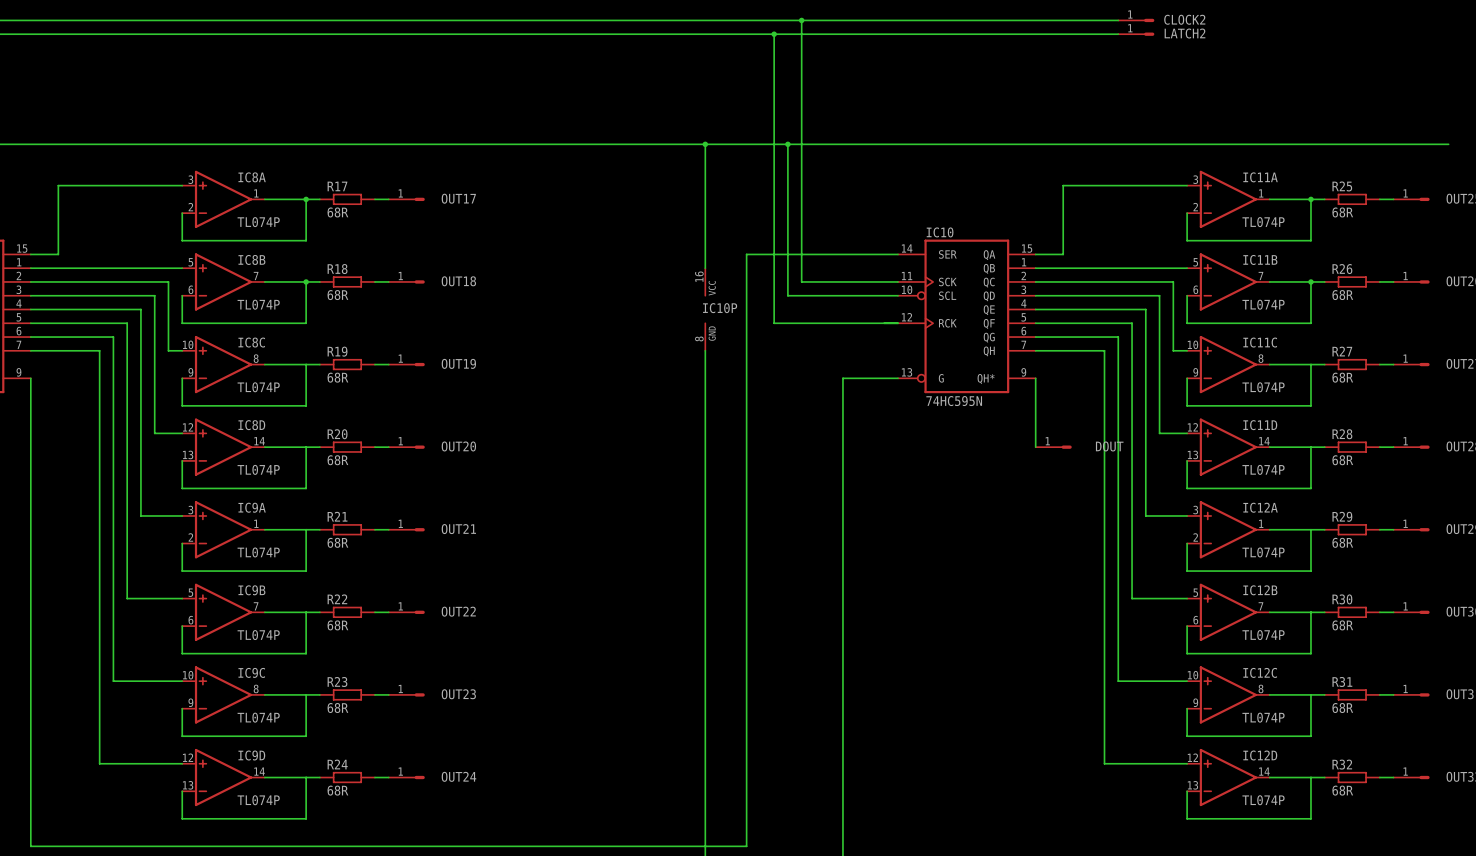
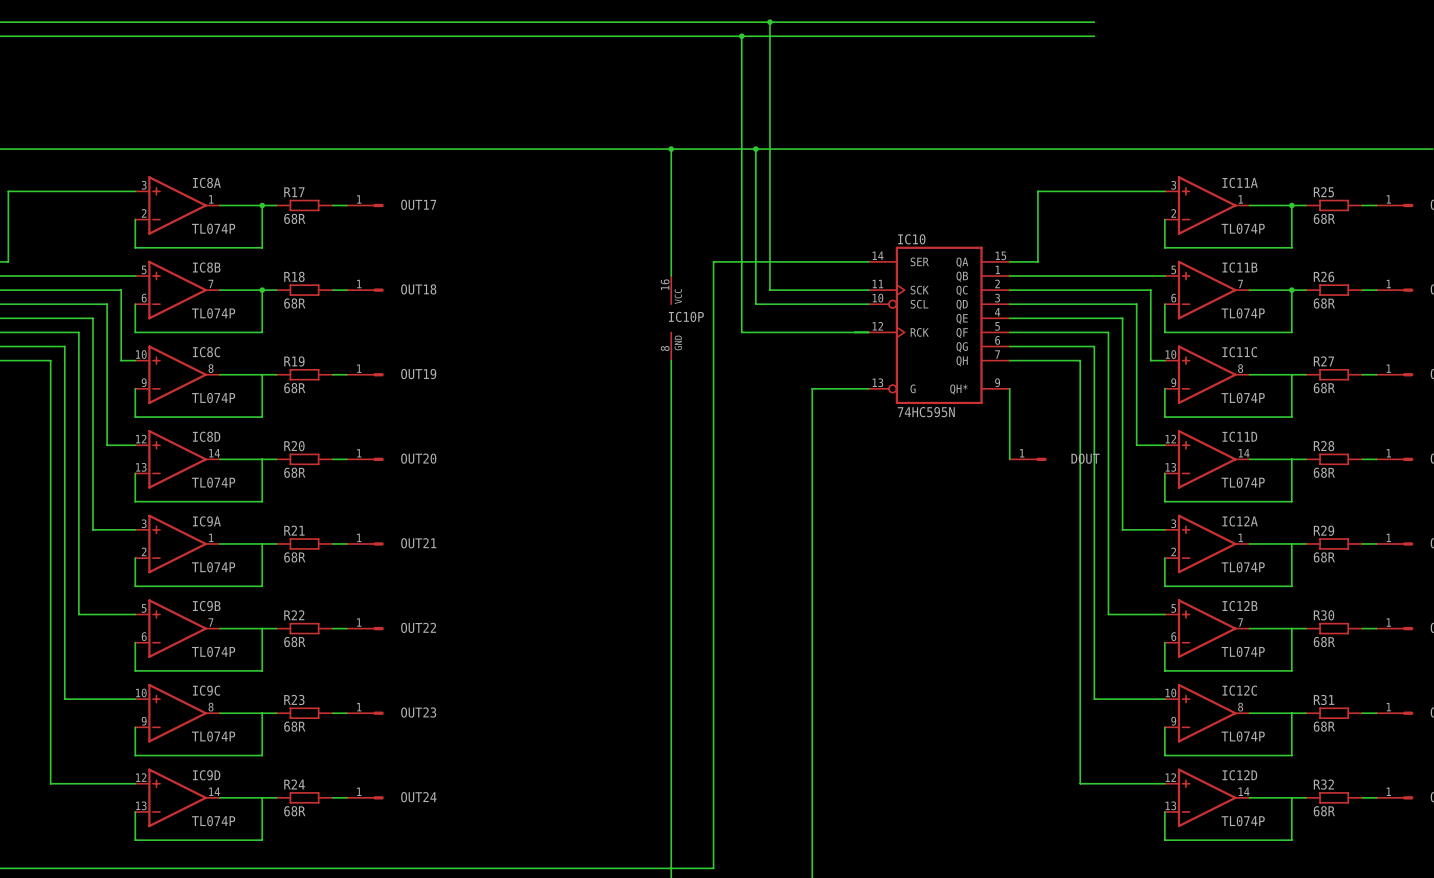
CLOCK2: (1136, 20) -> none
LATCH2: (1136, 34) -> none

